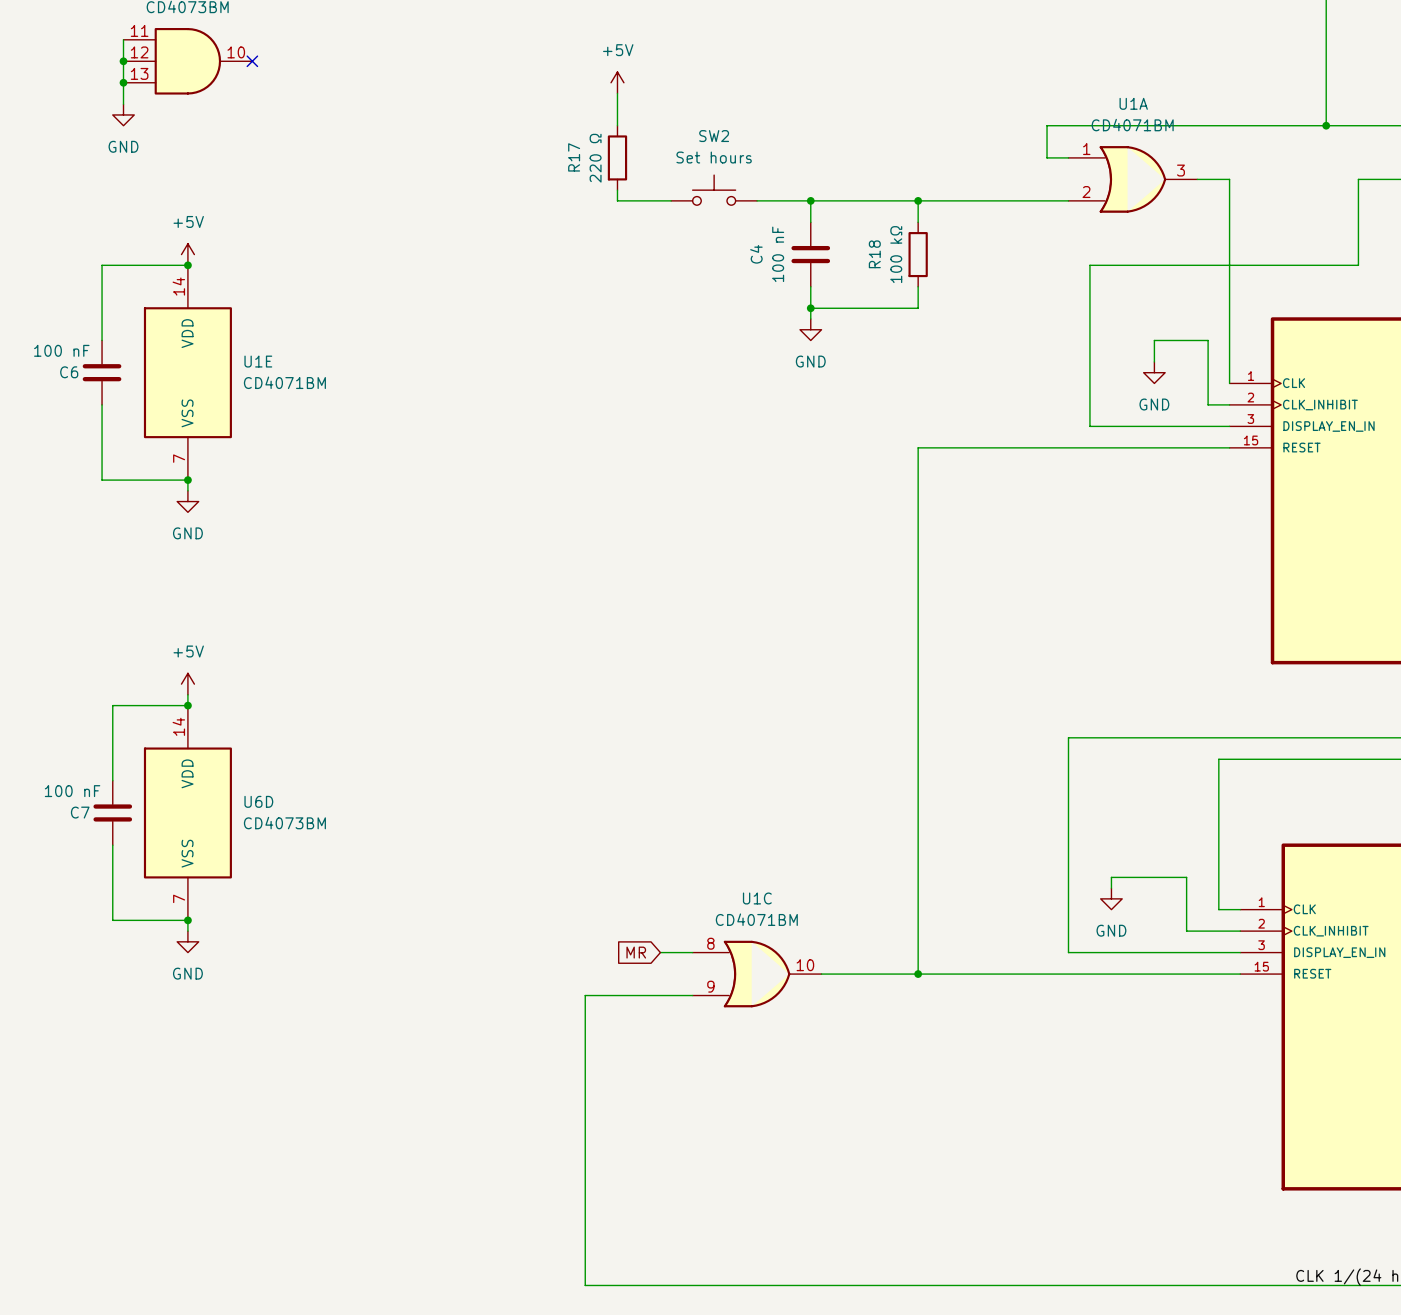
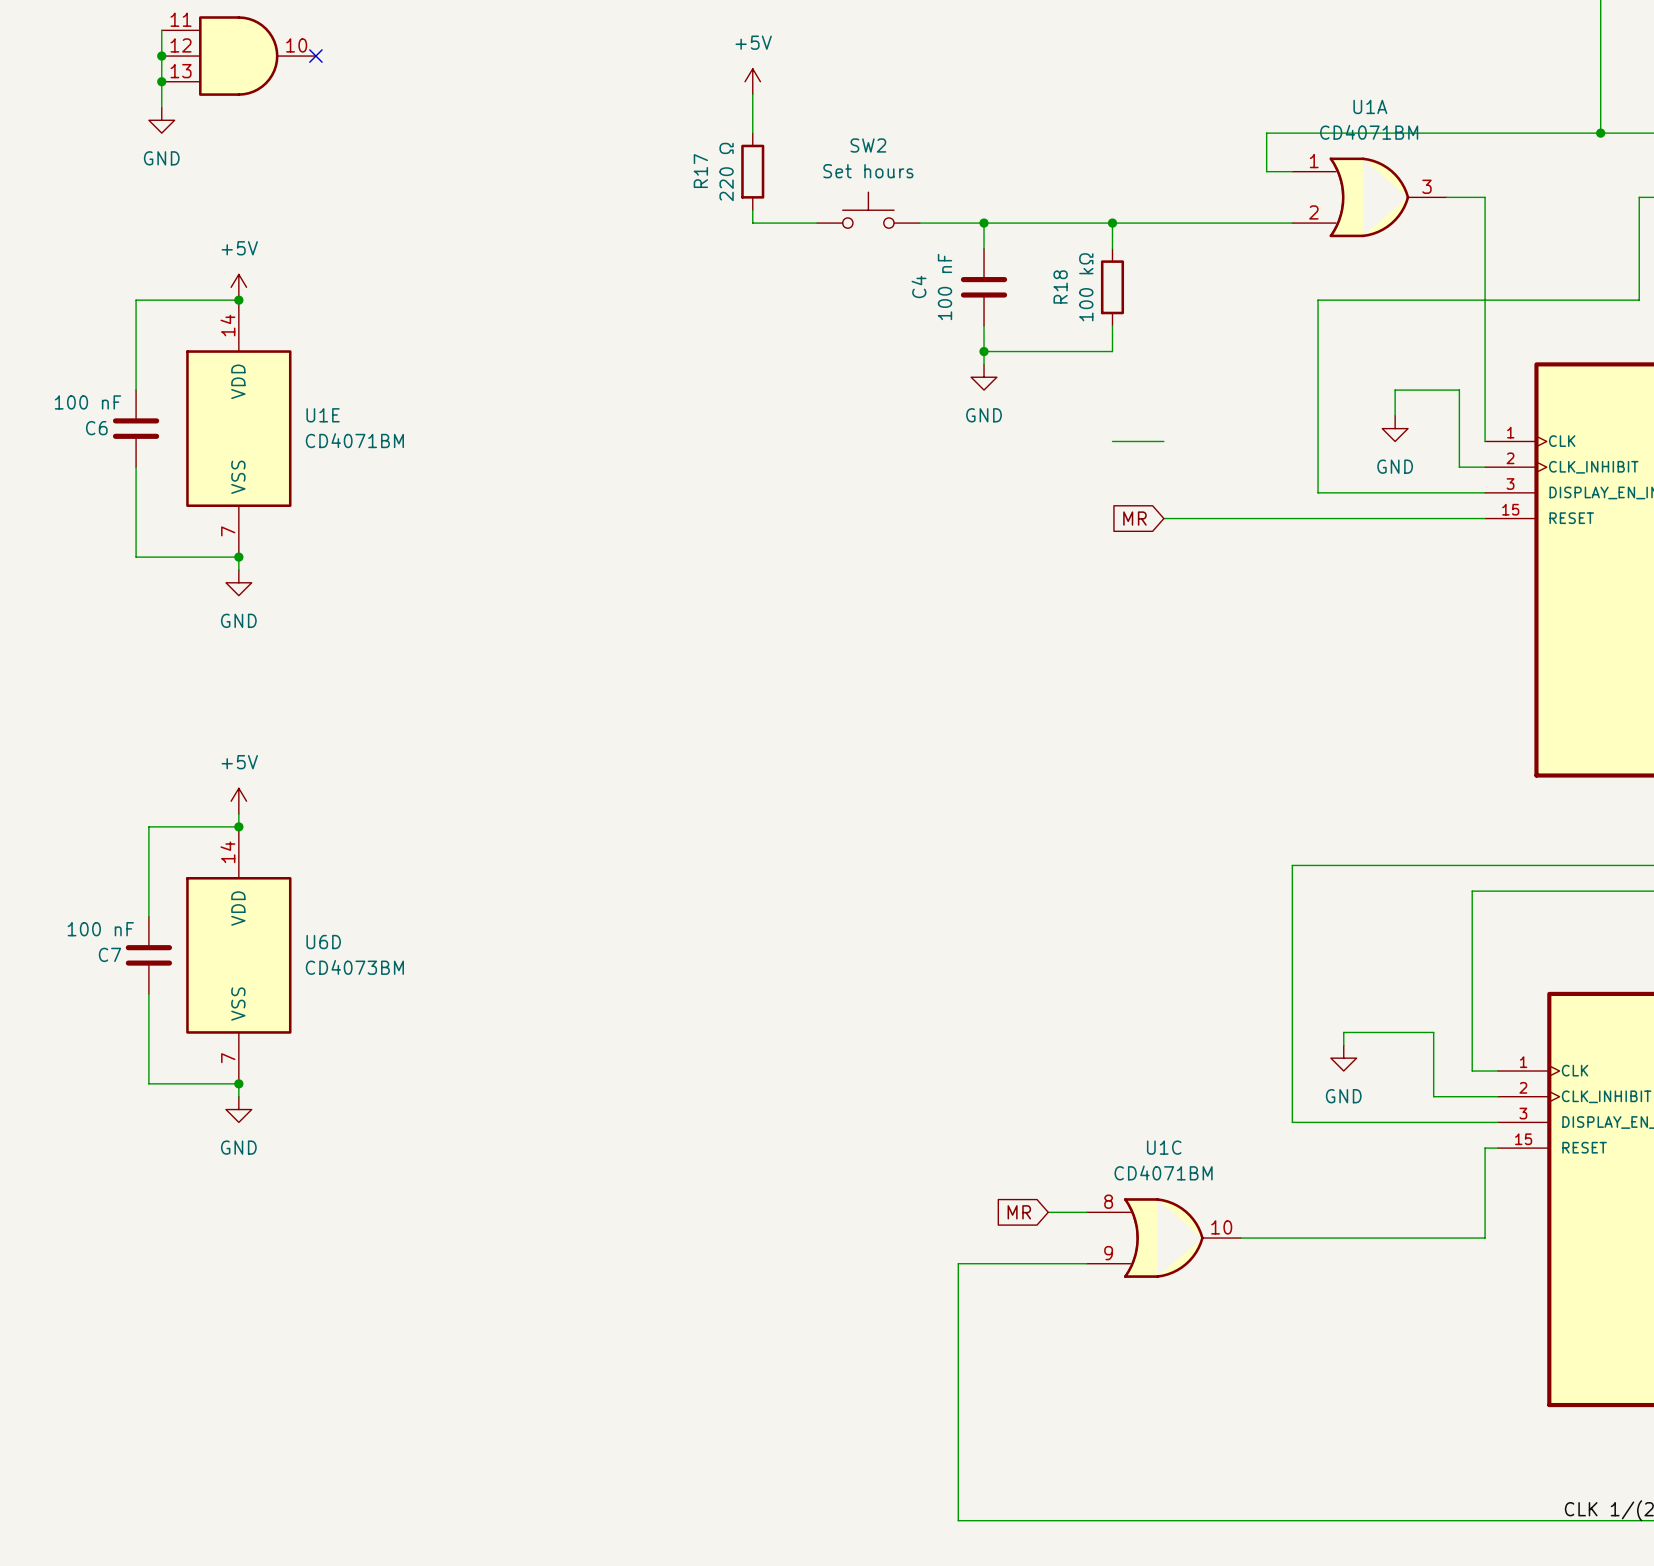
wire: none -> (1112, 441) (1163, 441)
global label: none -> MR (1134, 518)
wire: (961, 447) (918, 447) (918, 974) -> none
global label: MR (636, 952) -> none
wire: (660, 952) (692, 952) -> none
U1C position: (757, 974) -> (1163, 1238)
wire: (821, 974) (1229, 974) -> (1240, 1238) (1485, 1238) (1485, 1148)
junction: (918, 974) -> none
wire: (692, 995) (585, 995) (585, 1285) (789, 1285) -> (1086, 1263) (958, 1263) (958, 1520)
global label: none -> MR (1019, 1212)
wire: none -> (1048, 1212) (1086, 1212)

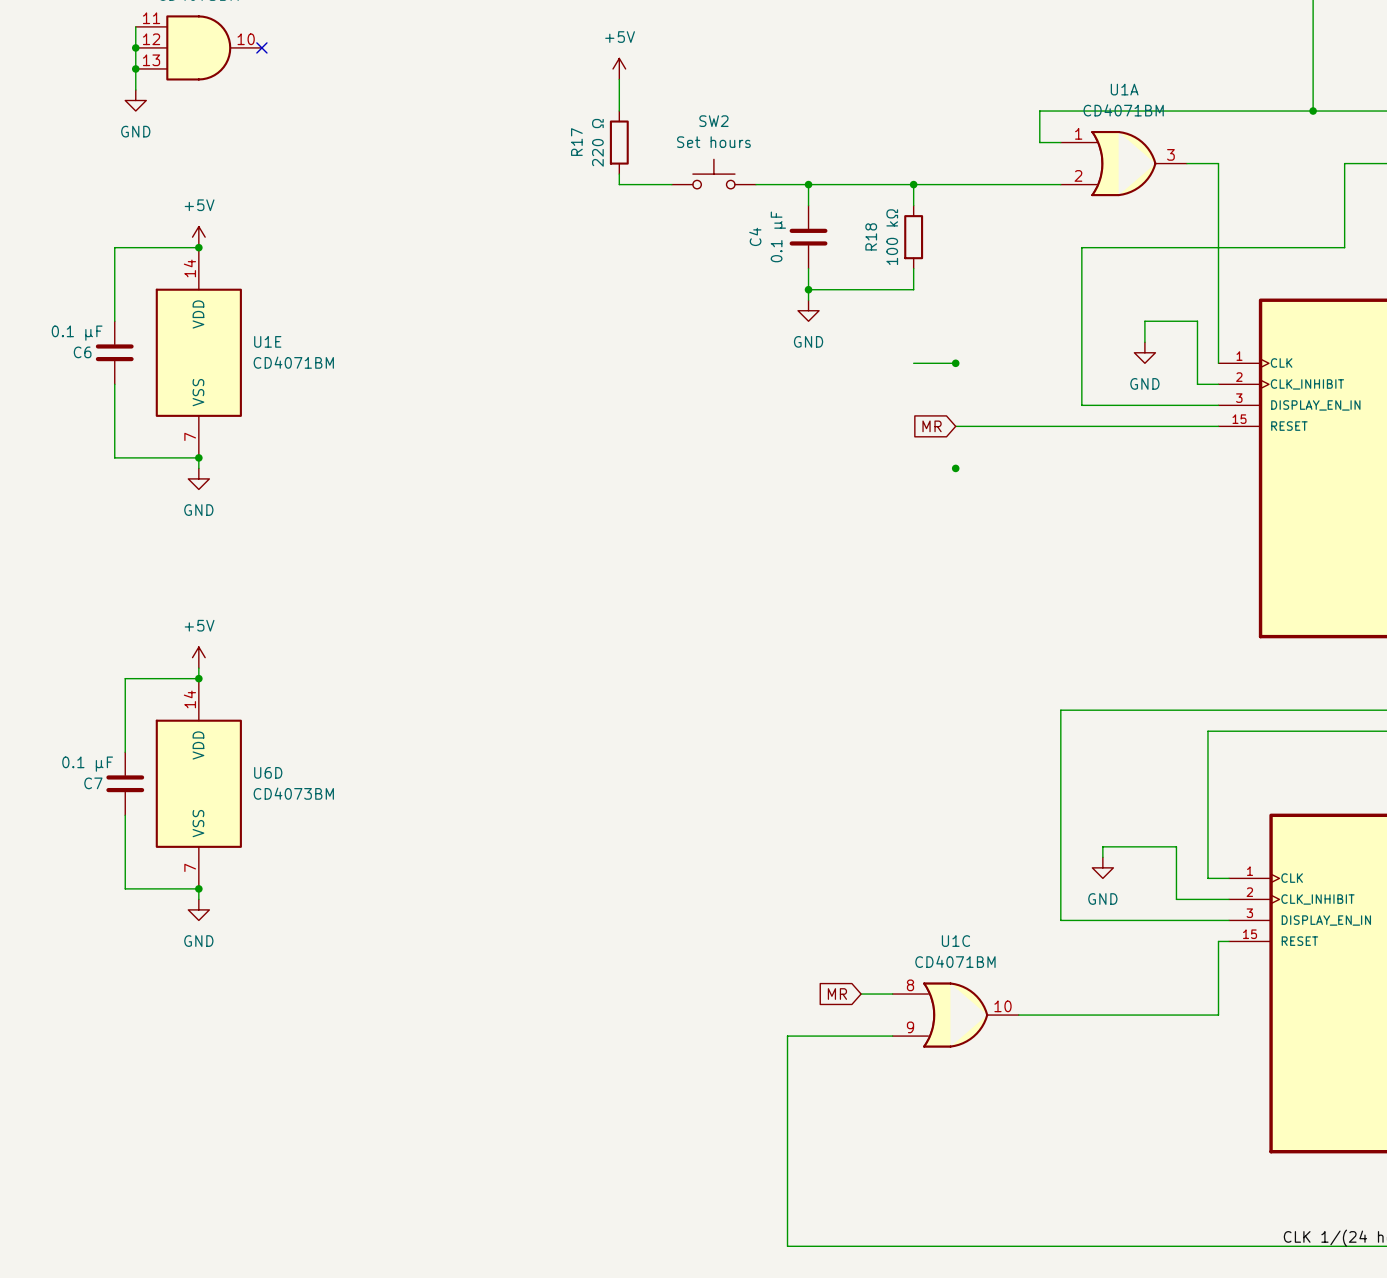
C4 value: 100 nF (944, 286) -> 0.1 µF (778, 236)
C6 value: 100 nF (87, 402) -> 0.1 µF (77, 333)
junction: none -> (955, 363)
junction: none -> (955, 468)
C7 value: 100 nF (100, 929) -> 0.1 µF (87, 764)

